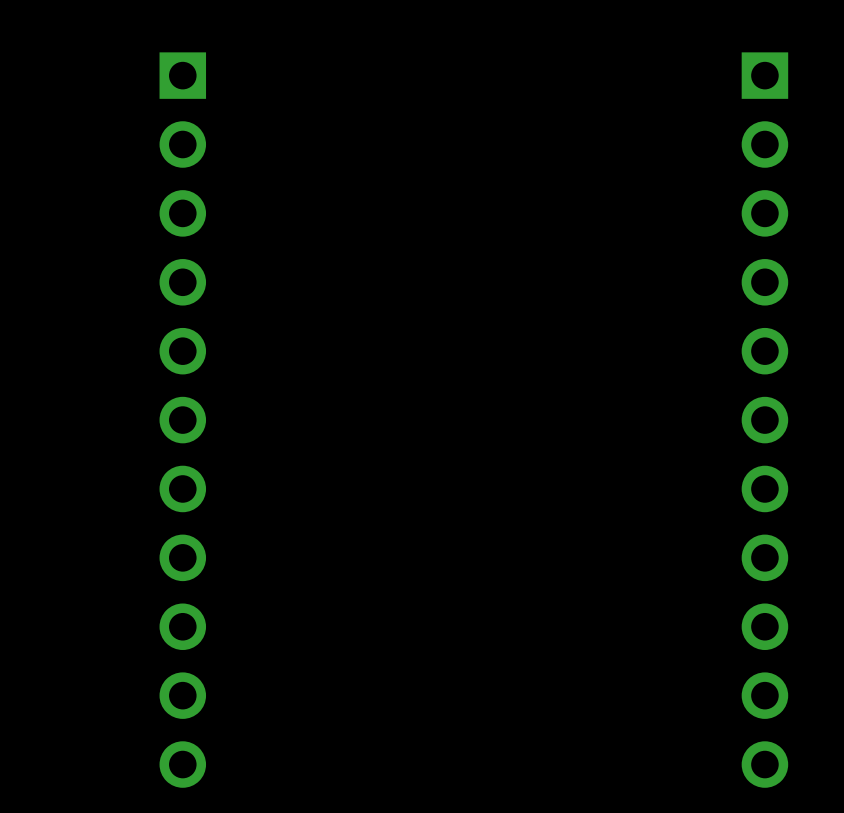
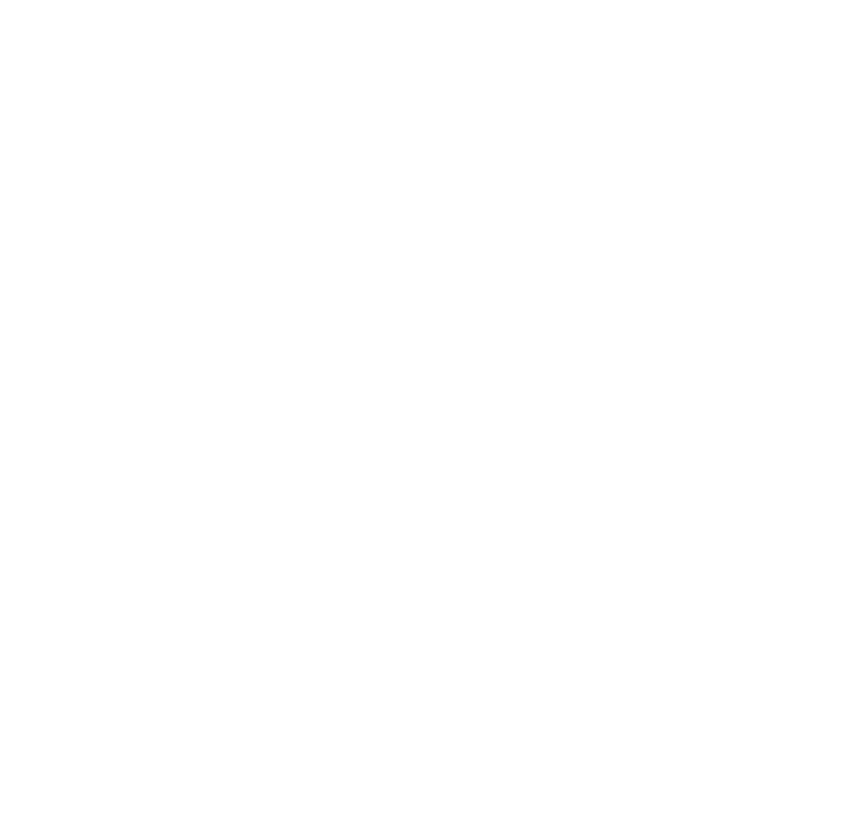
part: (182, 420) -> none
part: (764, 420) -> none

